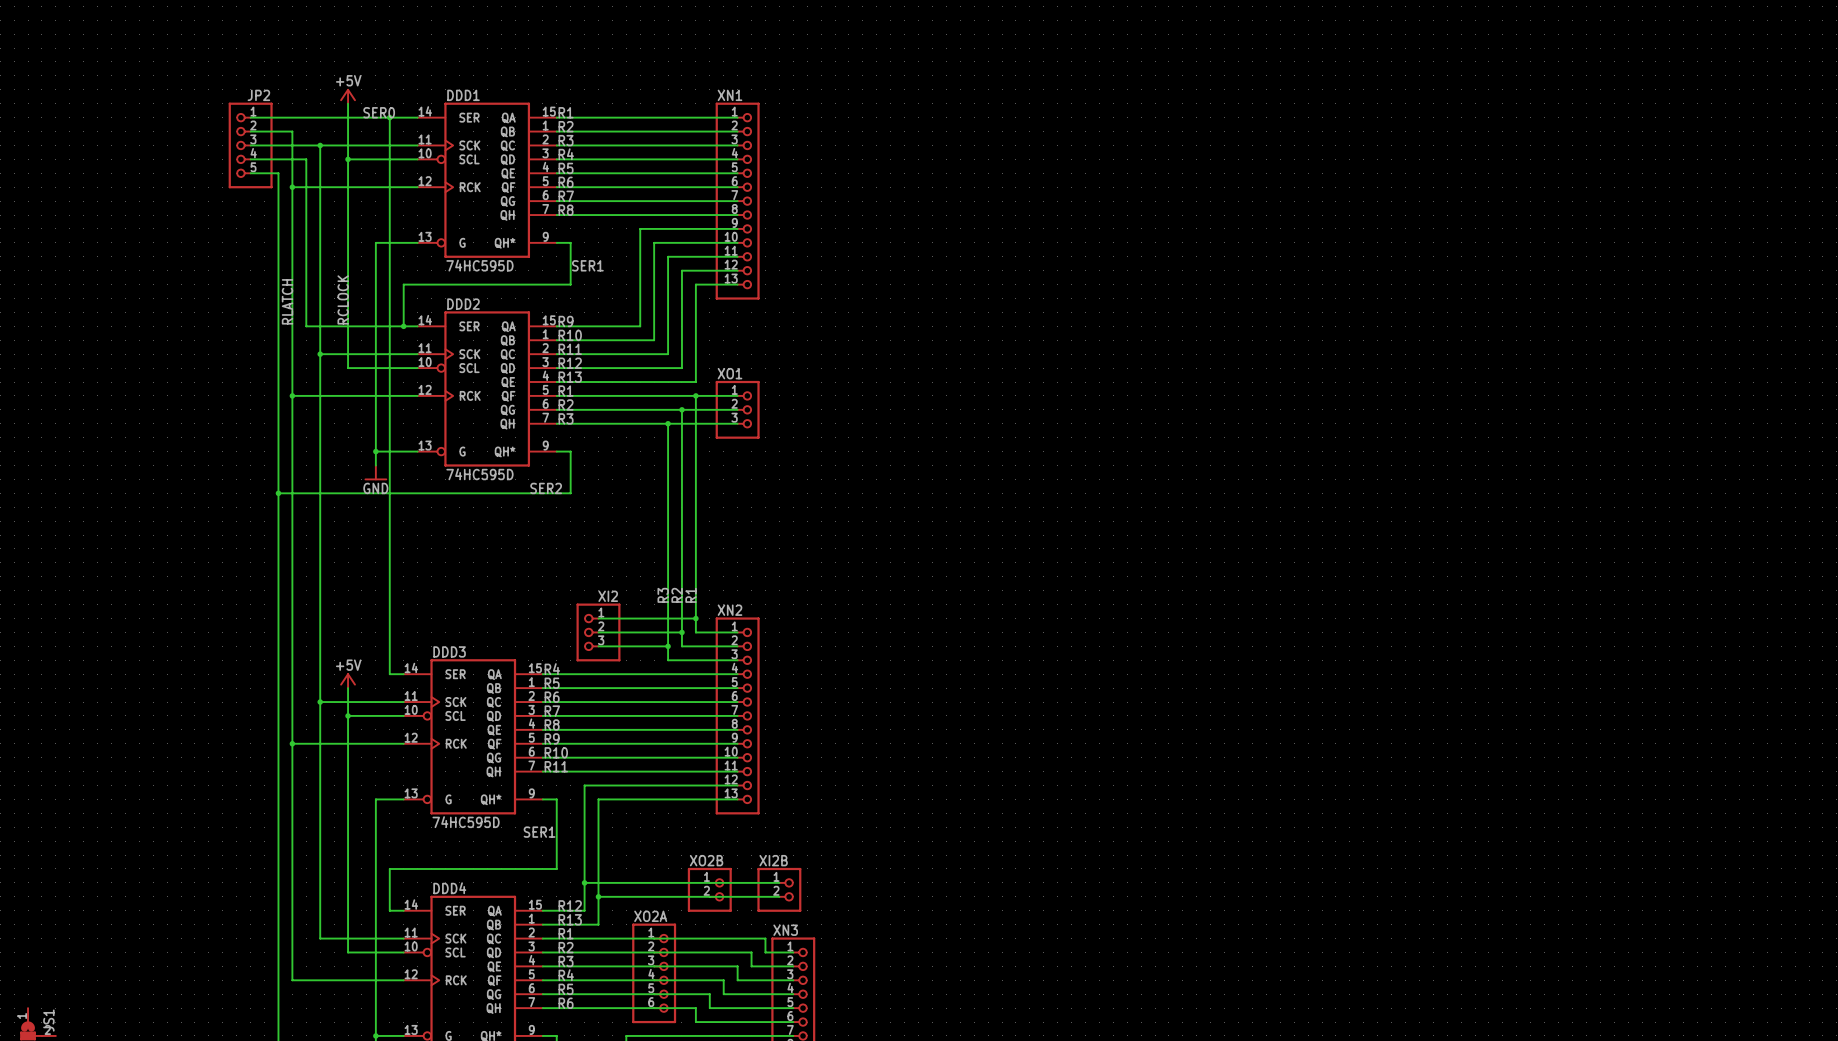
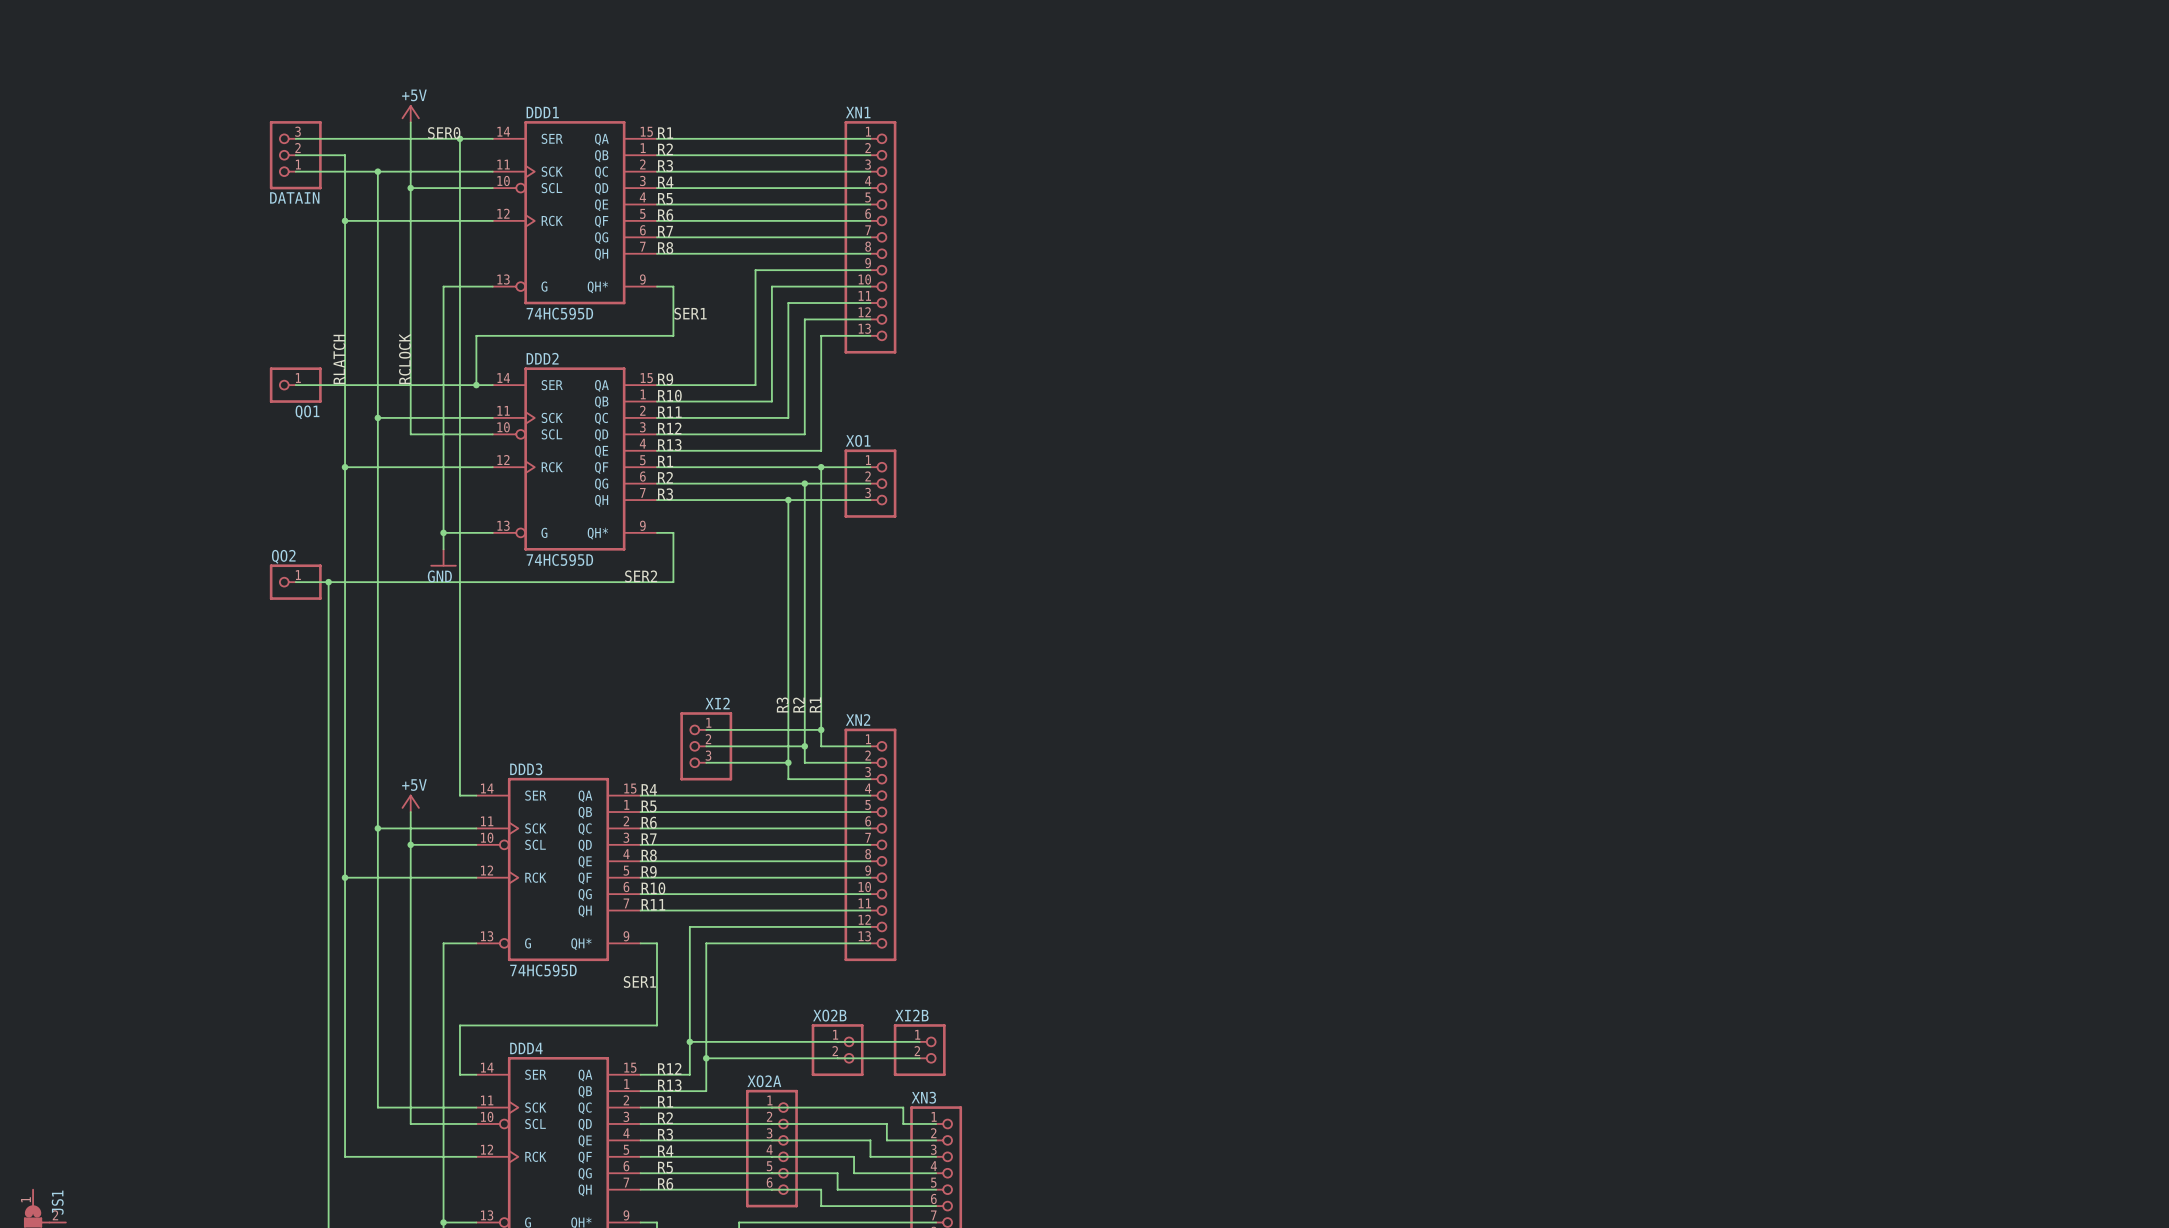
DATAIN: none -> (295, 155)
JP2: (250, 145) -> none
wire: (250, 159) (306, 159) (306, 326) -> (295, 385) (361, 385)
wire: (250, 173) (278, 173) (278, 493) -> (295, 582) (328, 582)
QO1: none -> (295, 385)
QO2: none -> (295, 582)

